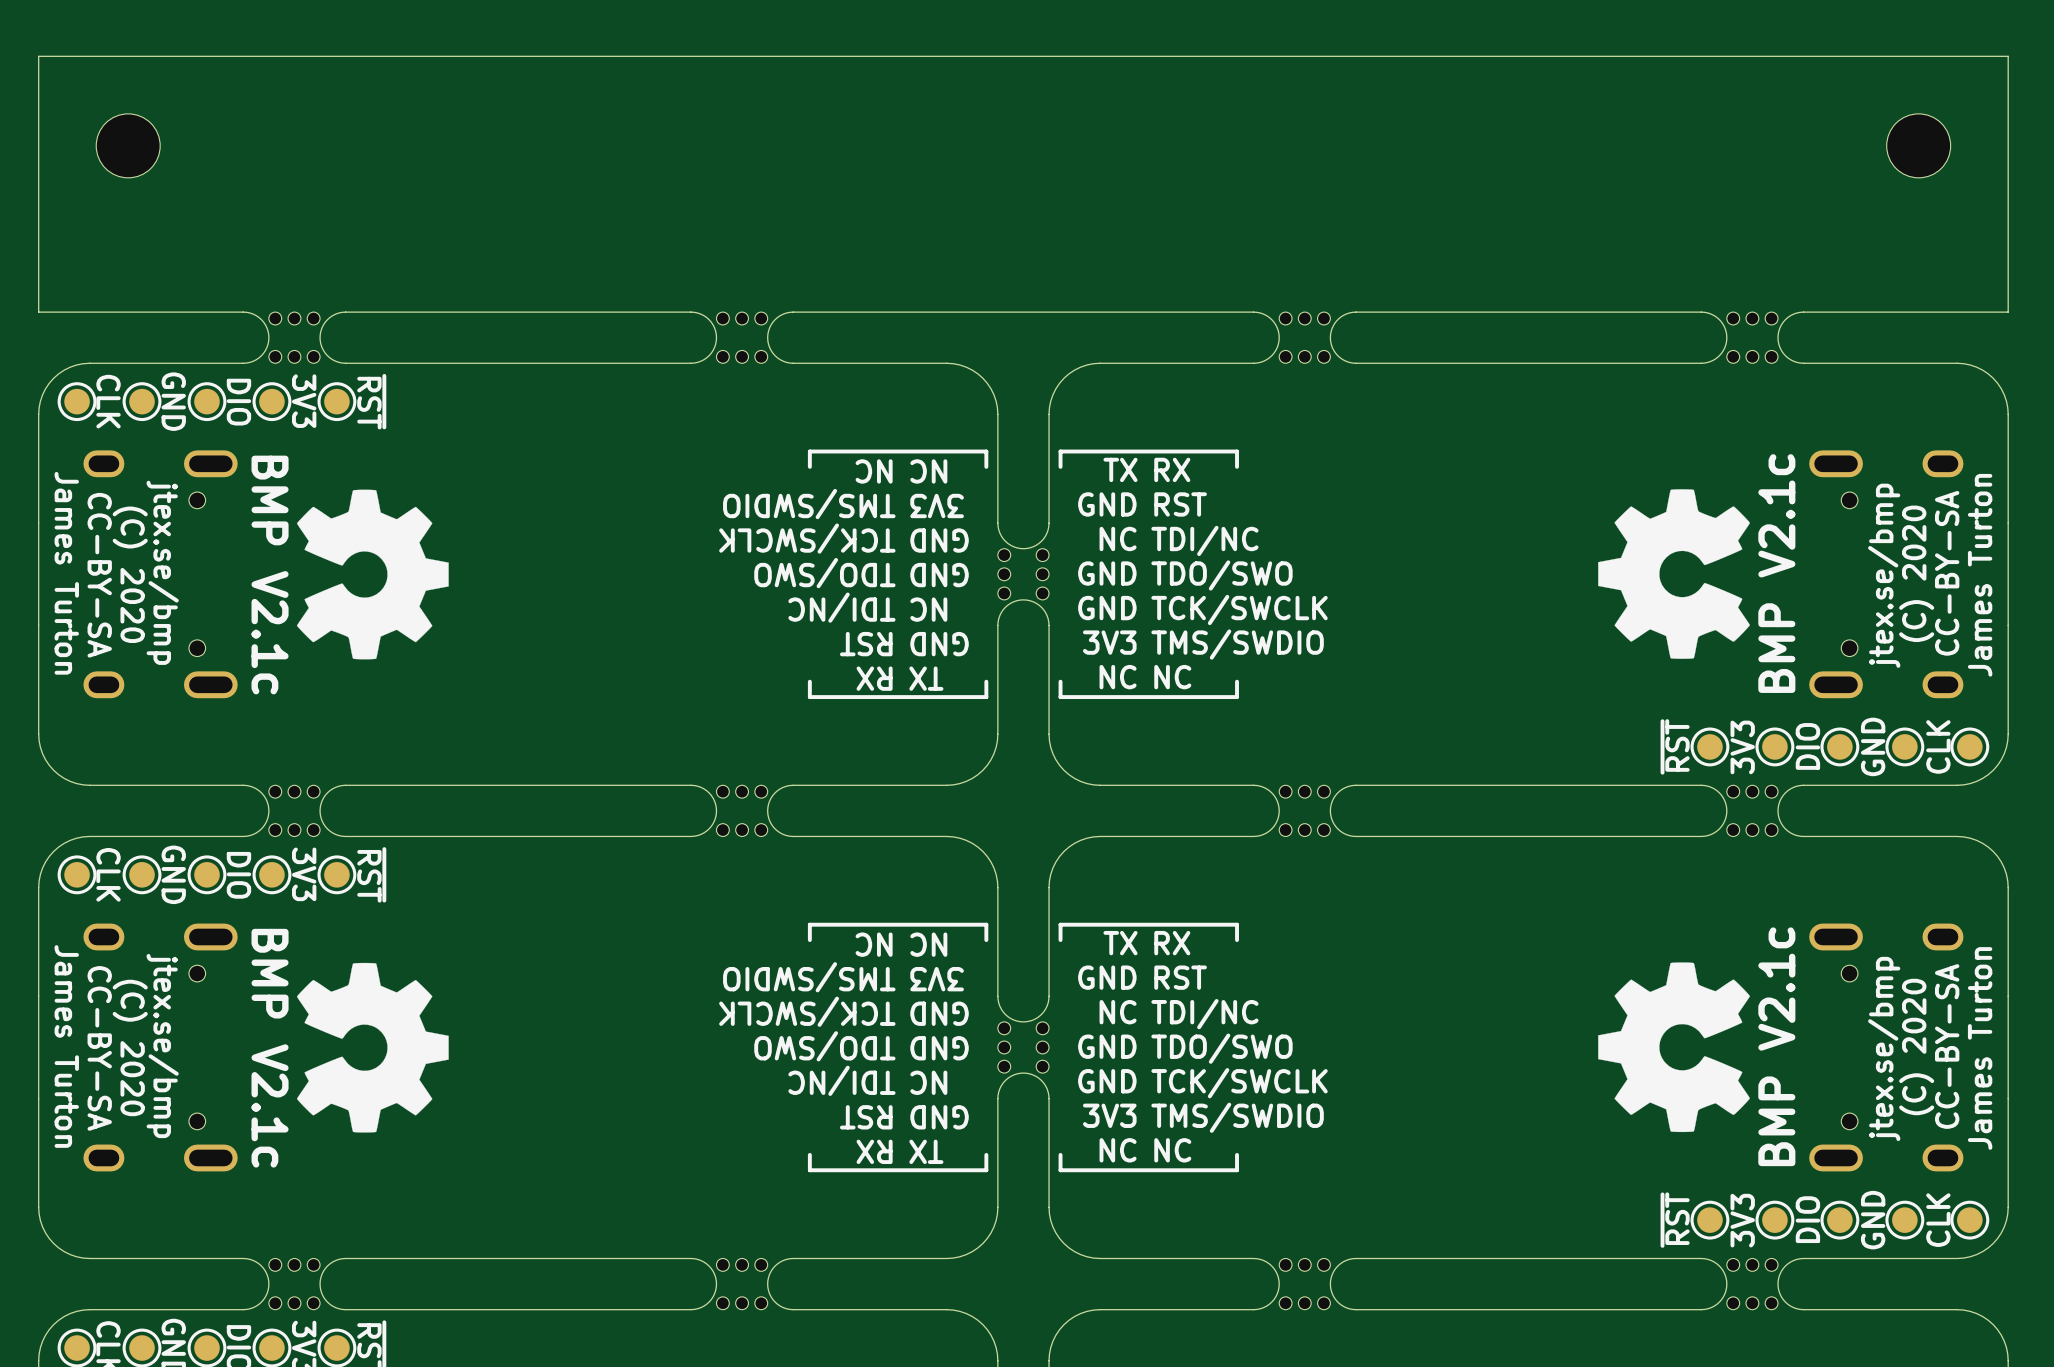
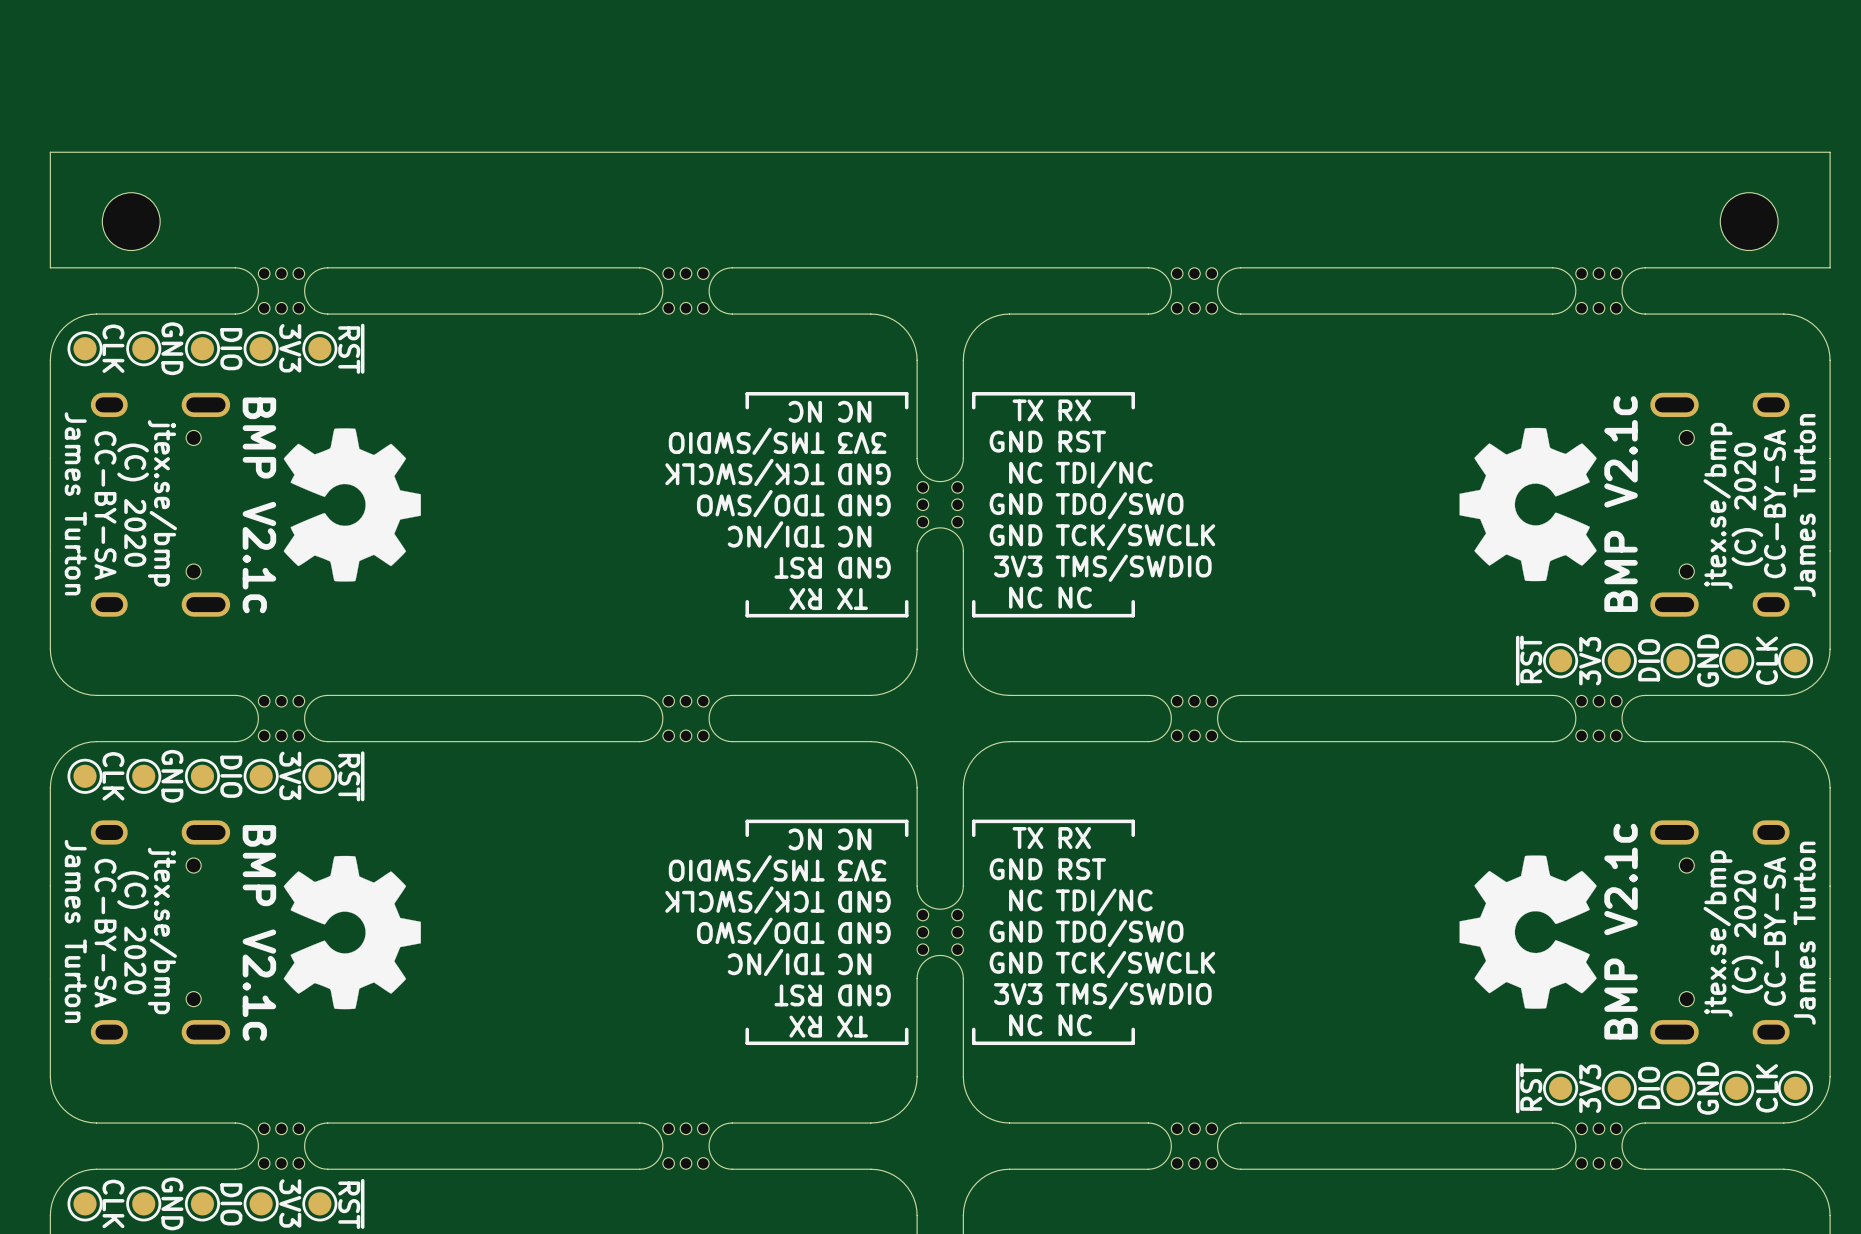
part position: (128, 145) -> (131, 221)
part position: (1918, 145) -> (1749, 221)
board edge: (2008, 184) (2008, 56) (38, 56) (38, 184) -> (1830, 152) (50, 152)

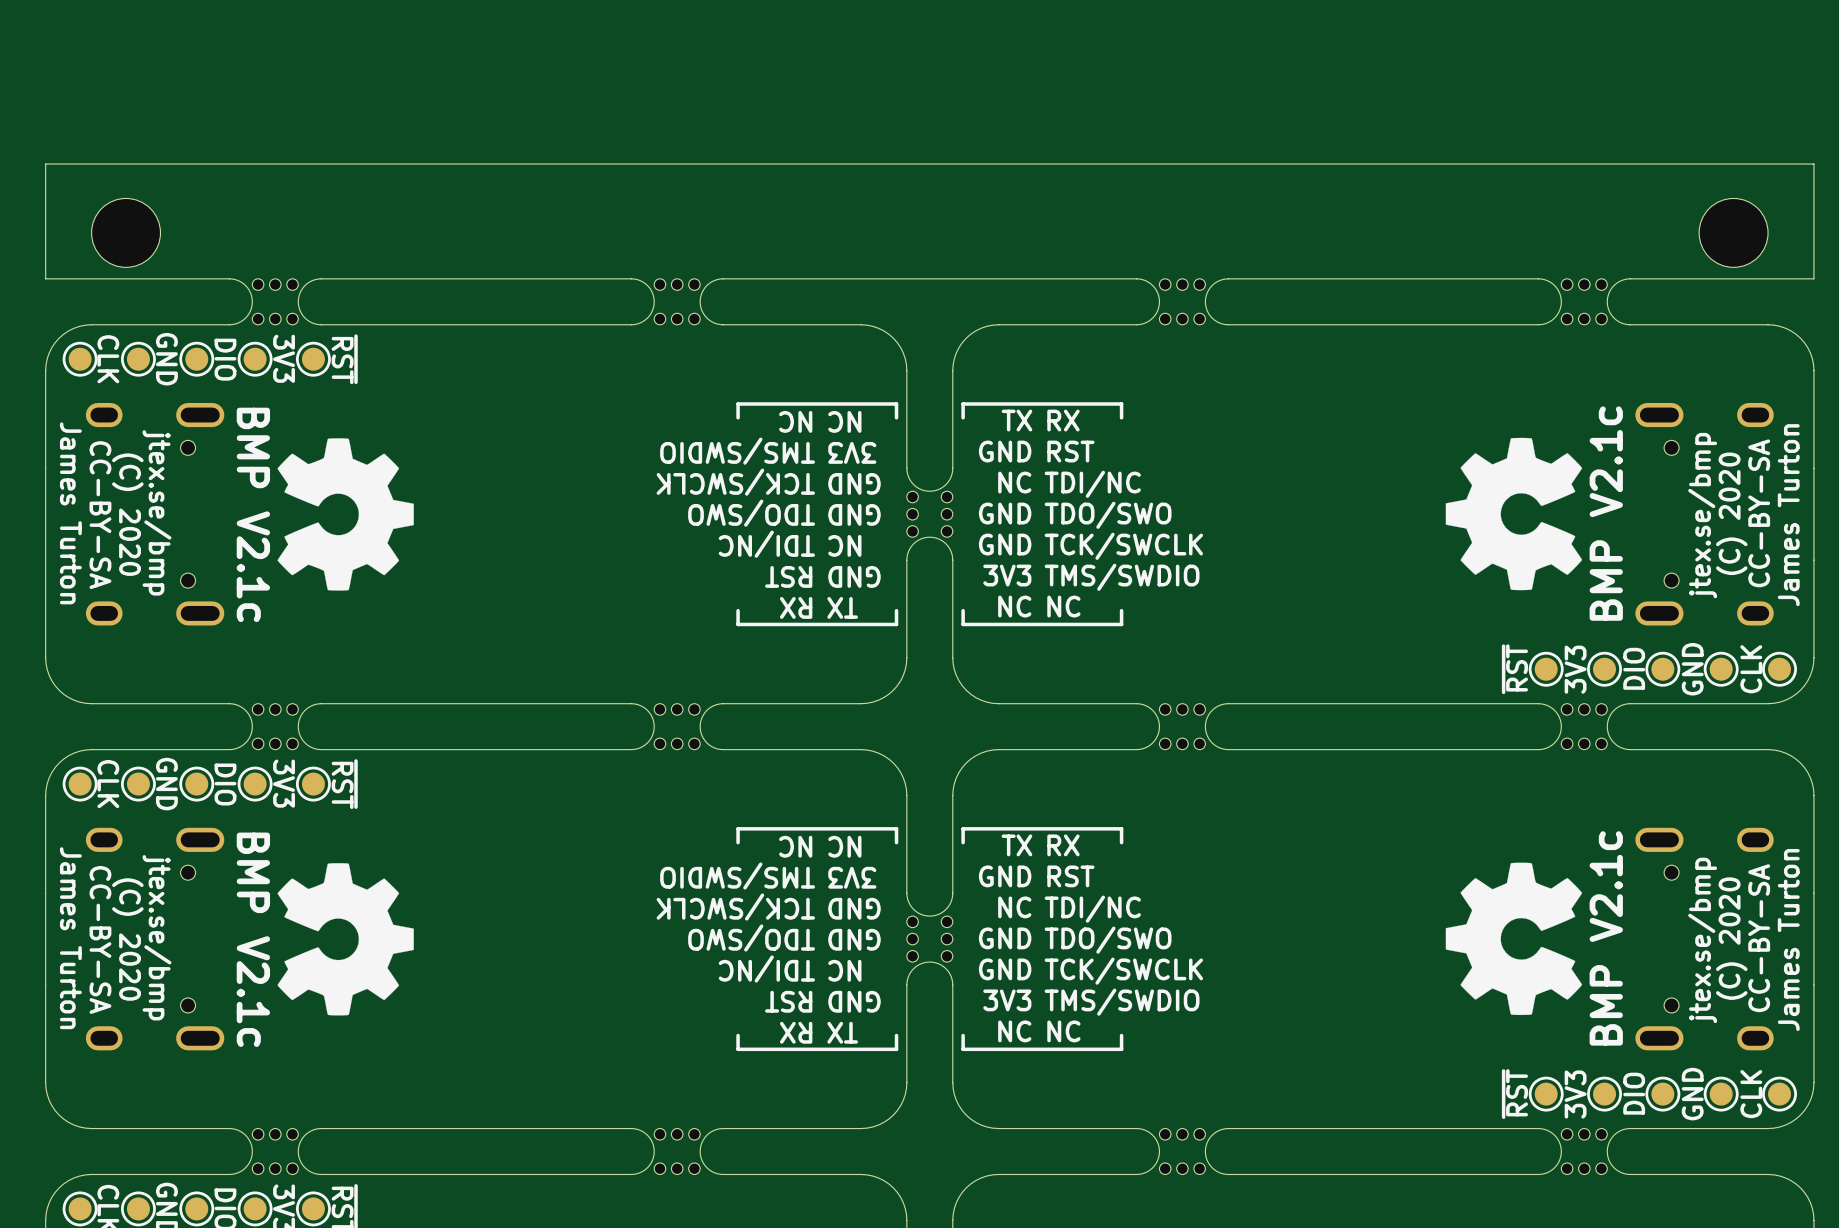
part footprint: [102, 192, 161, 251] -> [91, 198, 161, 268]
part footprint: [1720, 192, 1779, 251] -> [1699, 198, 1769, 268]

